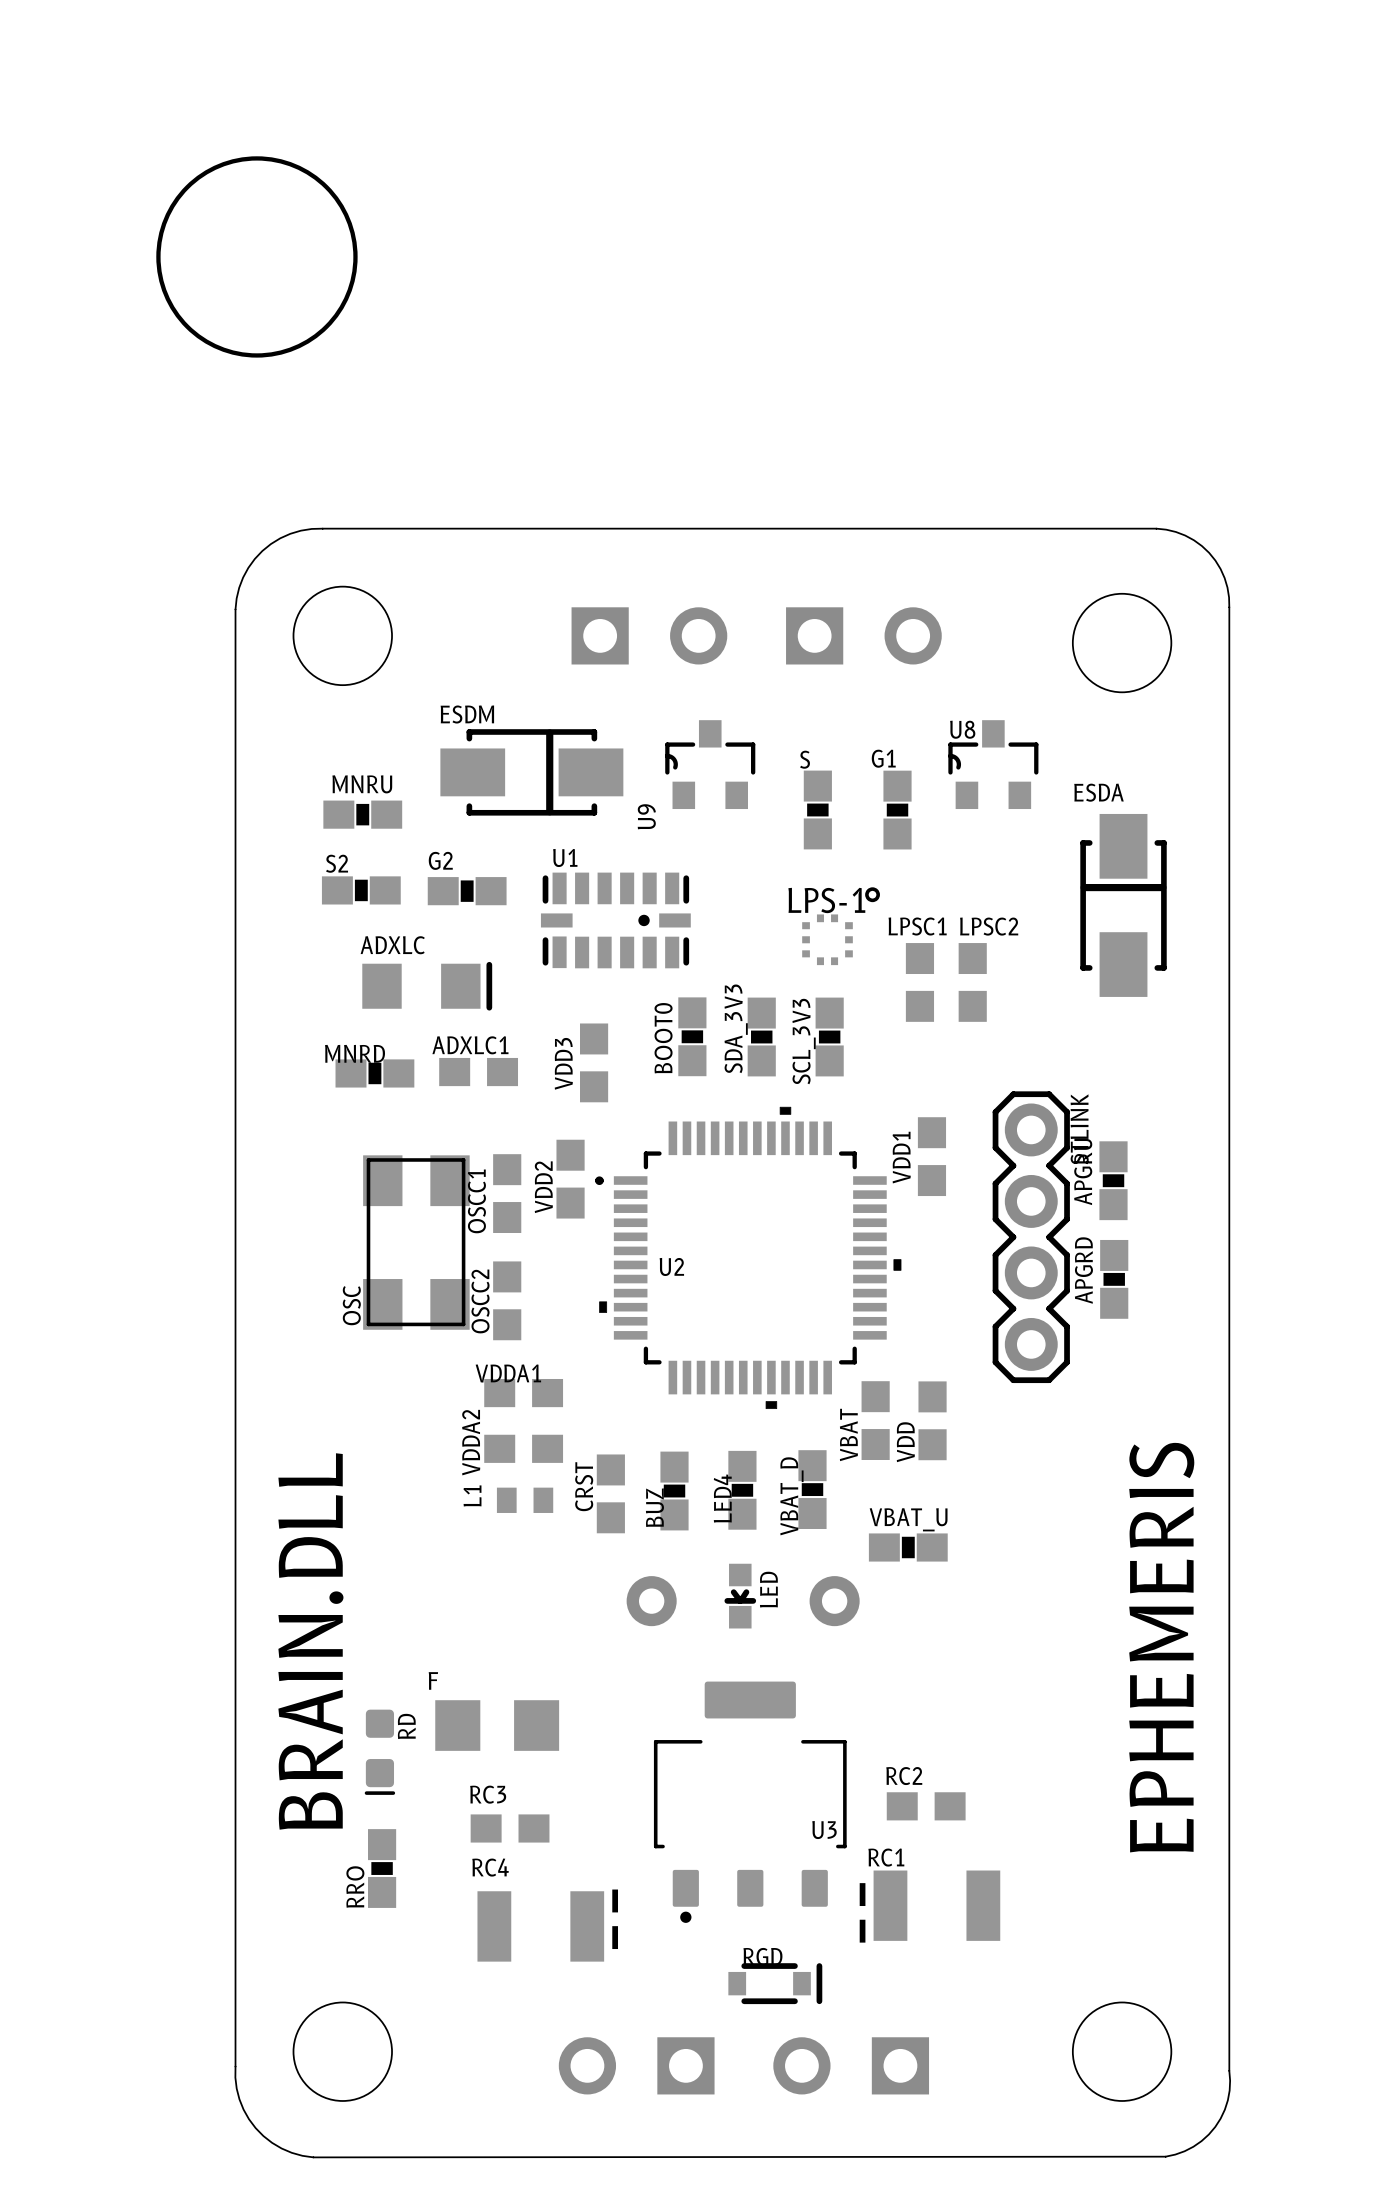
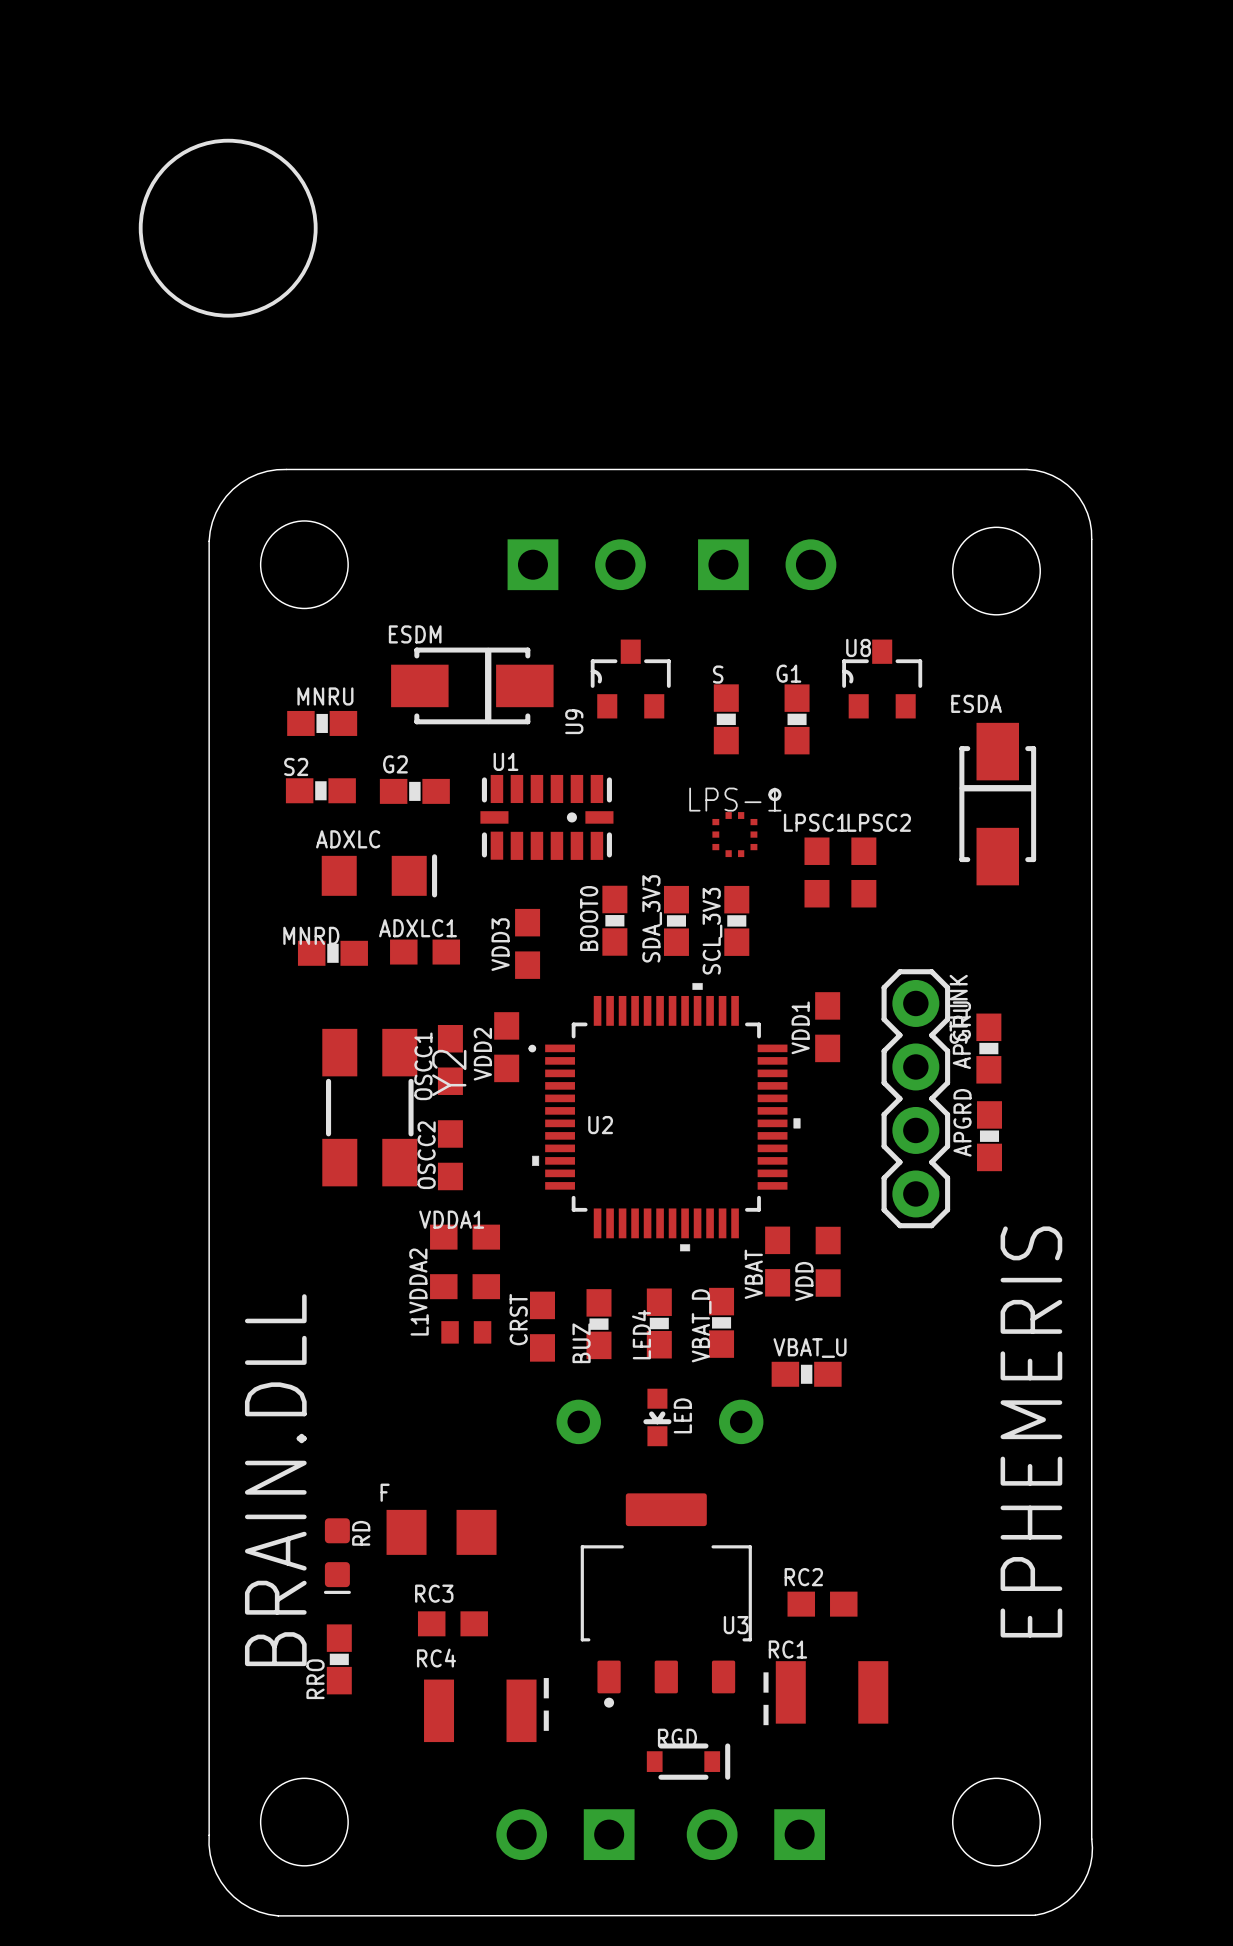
OSC: (416, 1242) -> none
Y2: none -> (369, 1107)

